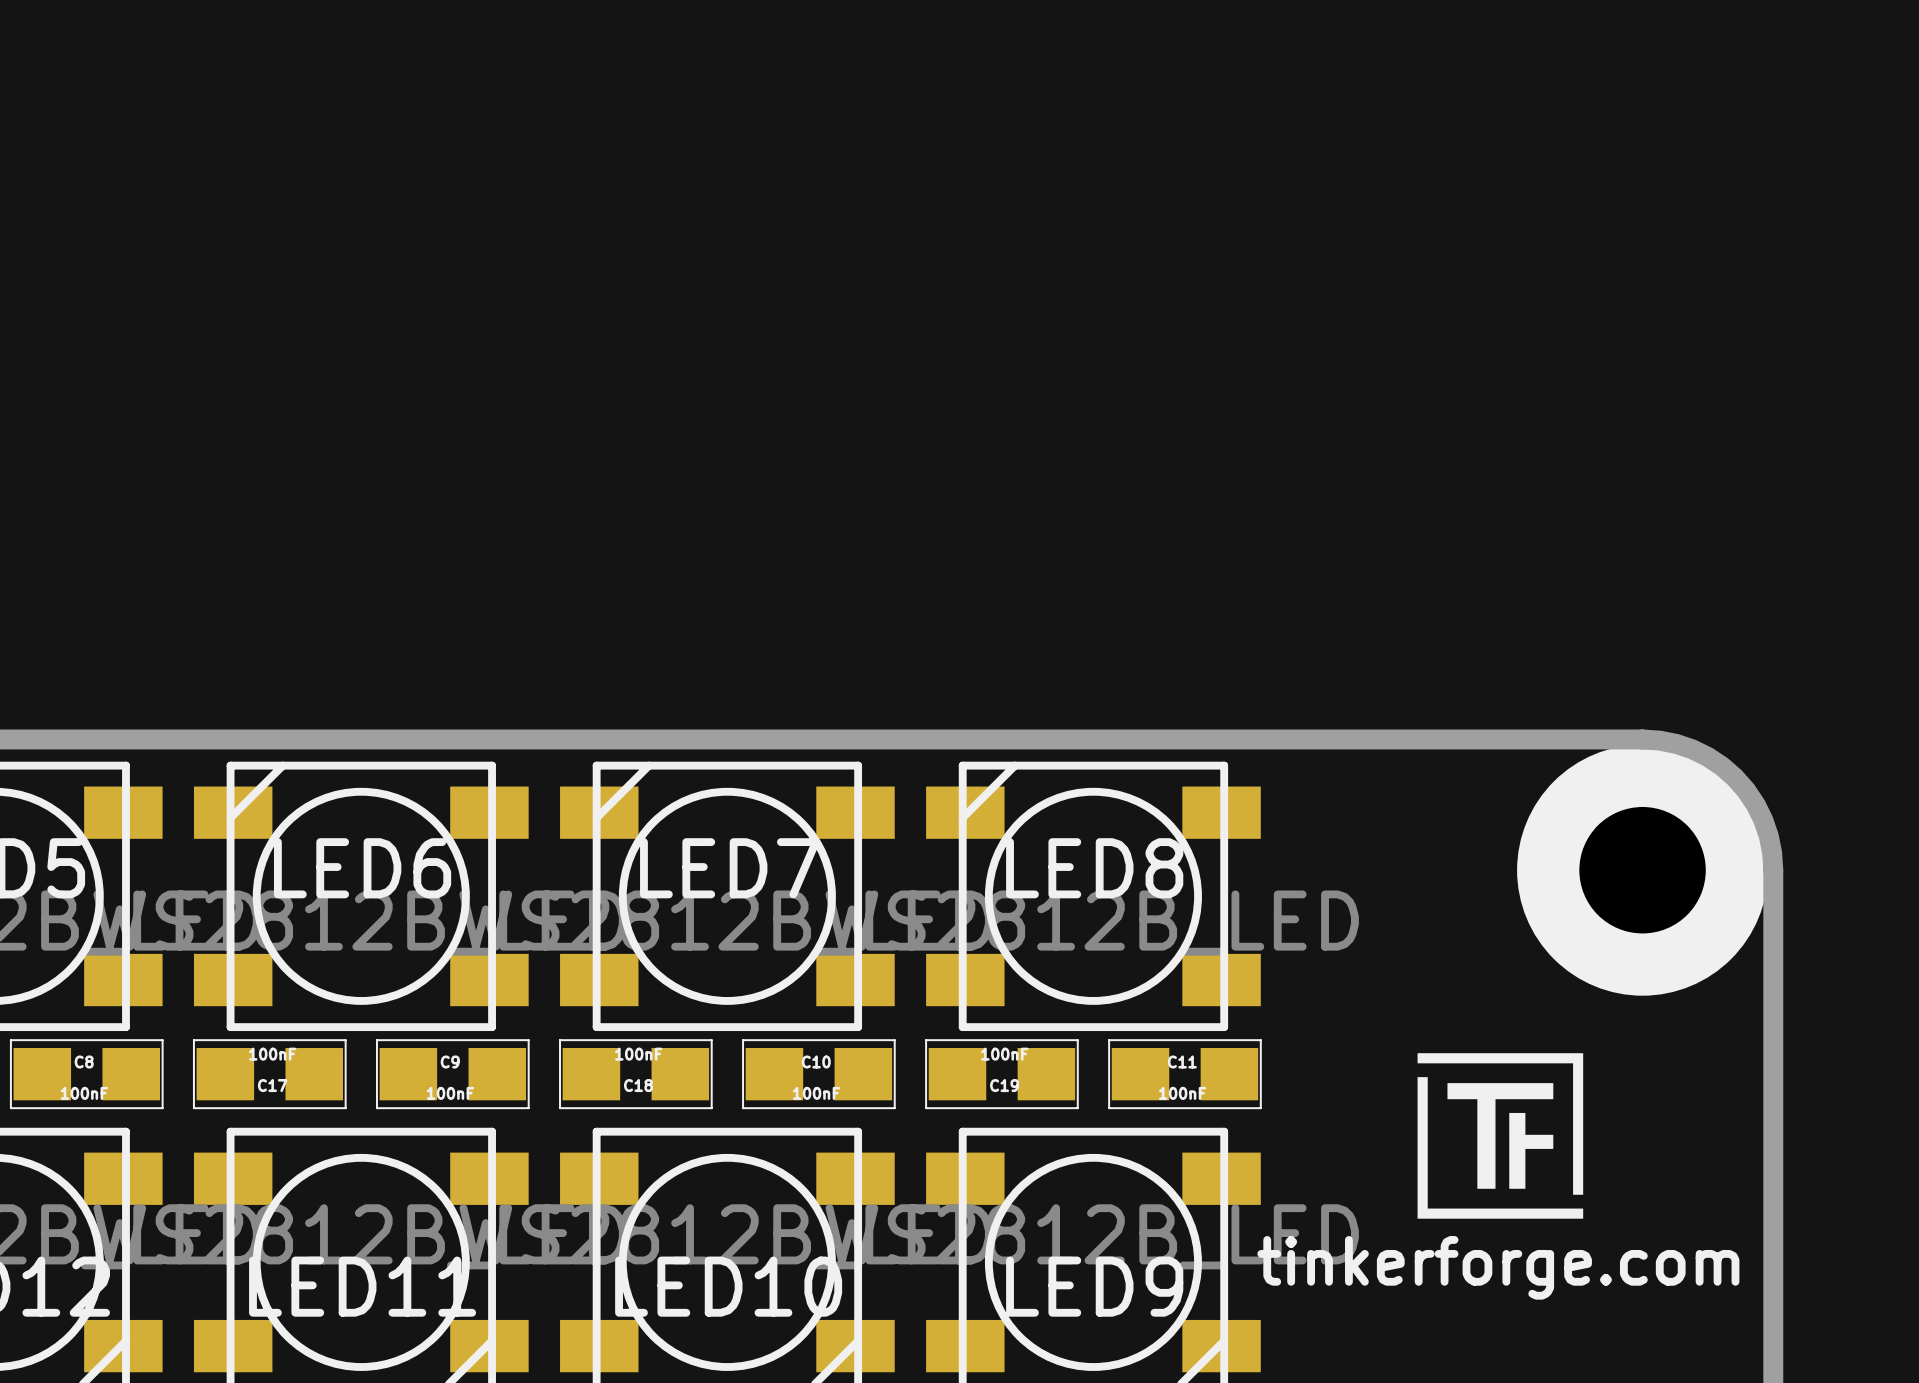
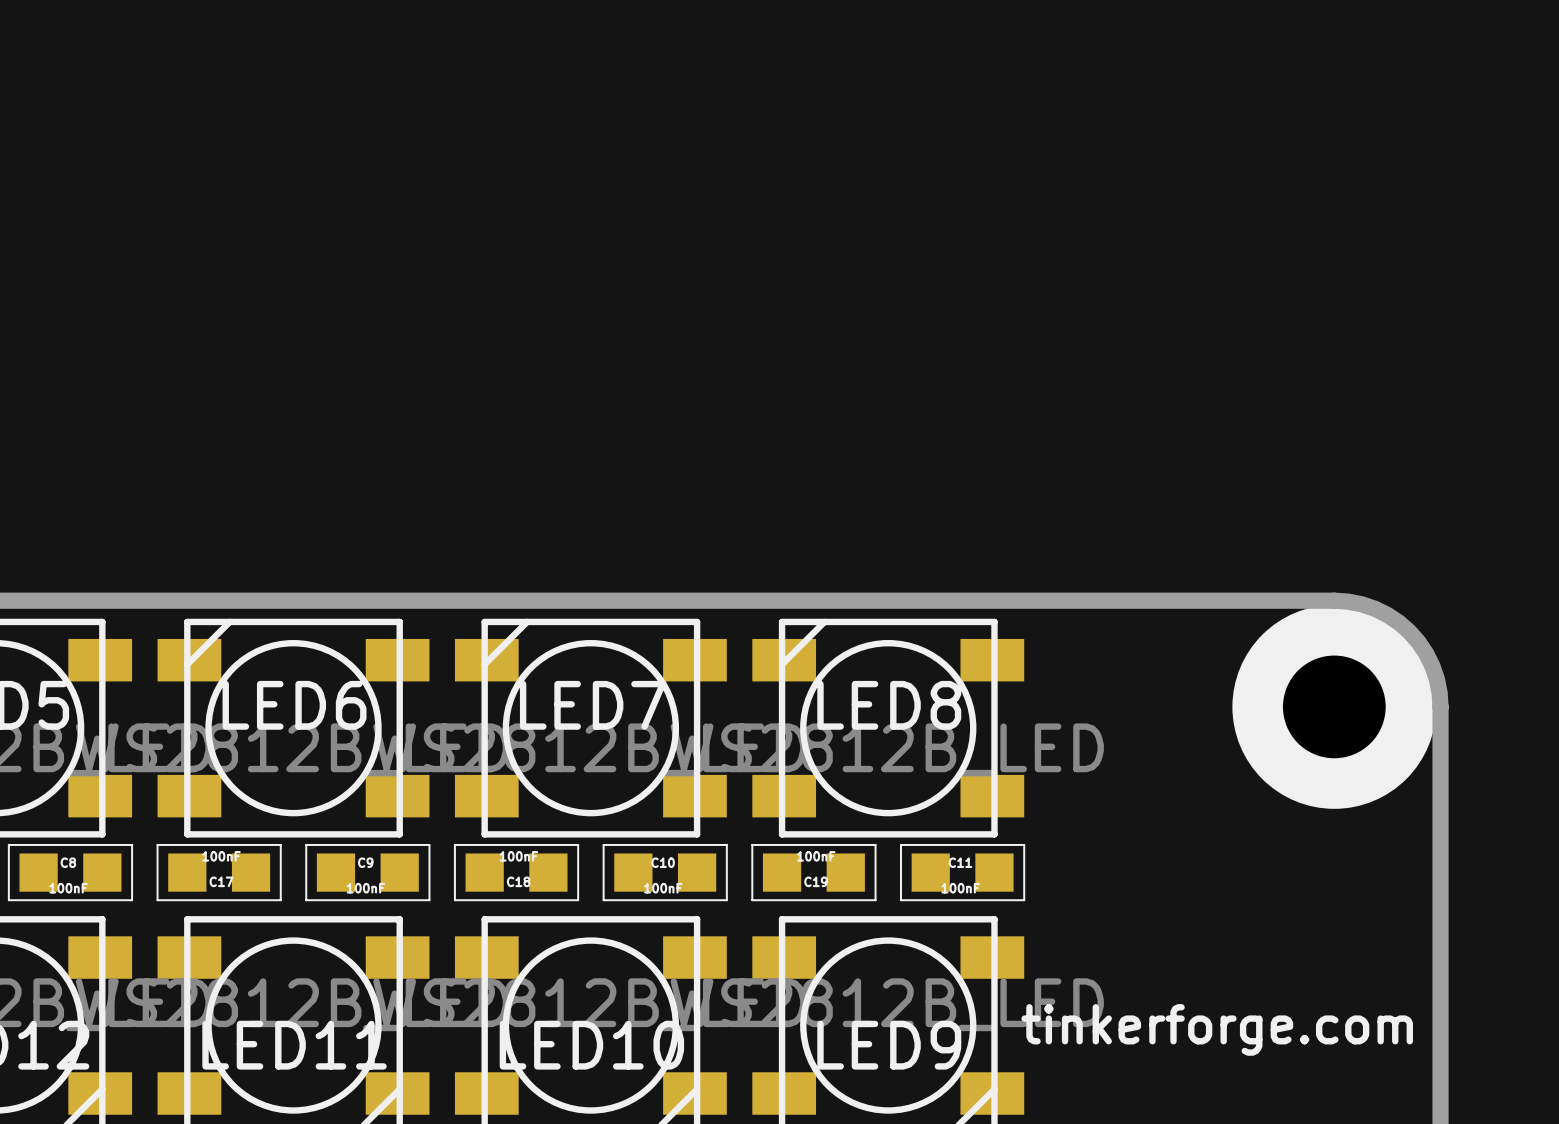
C8 footprint: [10, 1040, 163, 1109] -> [8, 844, 133, 901]
C17 footprint: [193, 1040, 346, 1109] -> [157, 844, 281, 901]
C9 footprint: [376, 1040, 529, 1109] -> [306, 844, 430, 901]
C18 footprint: [559, 1040, 712, 1109] -> [454, 844, 579, 901]
C10 footprint: [743, 1040, 895, 1109] -> [603, 844, 727, 901]
C19 footprint: [926, 1040, 1078, 1109] -> [752, 844, 876, 901]
C11 footprint: [1109, 1040, 1261, 1109] -> [900, 844, 1025, 901]
drawing: [1417, 1053, 1584, 1219] -> none

